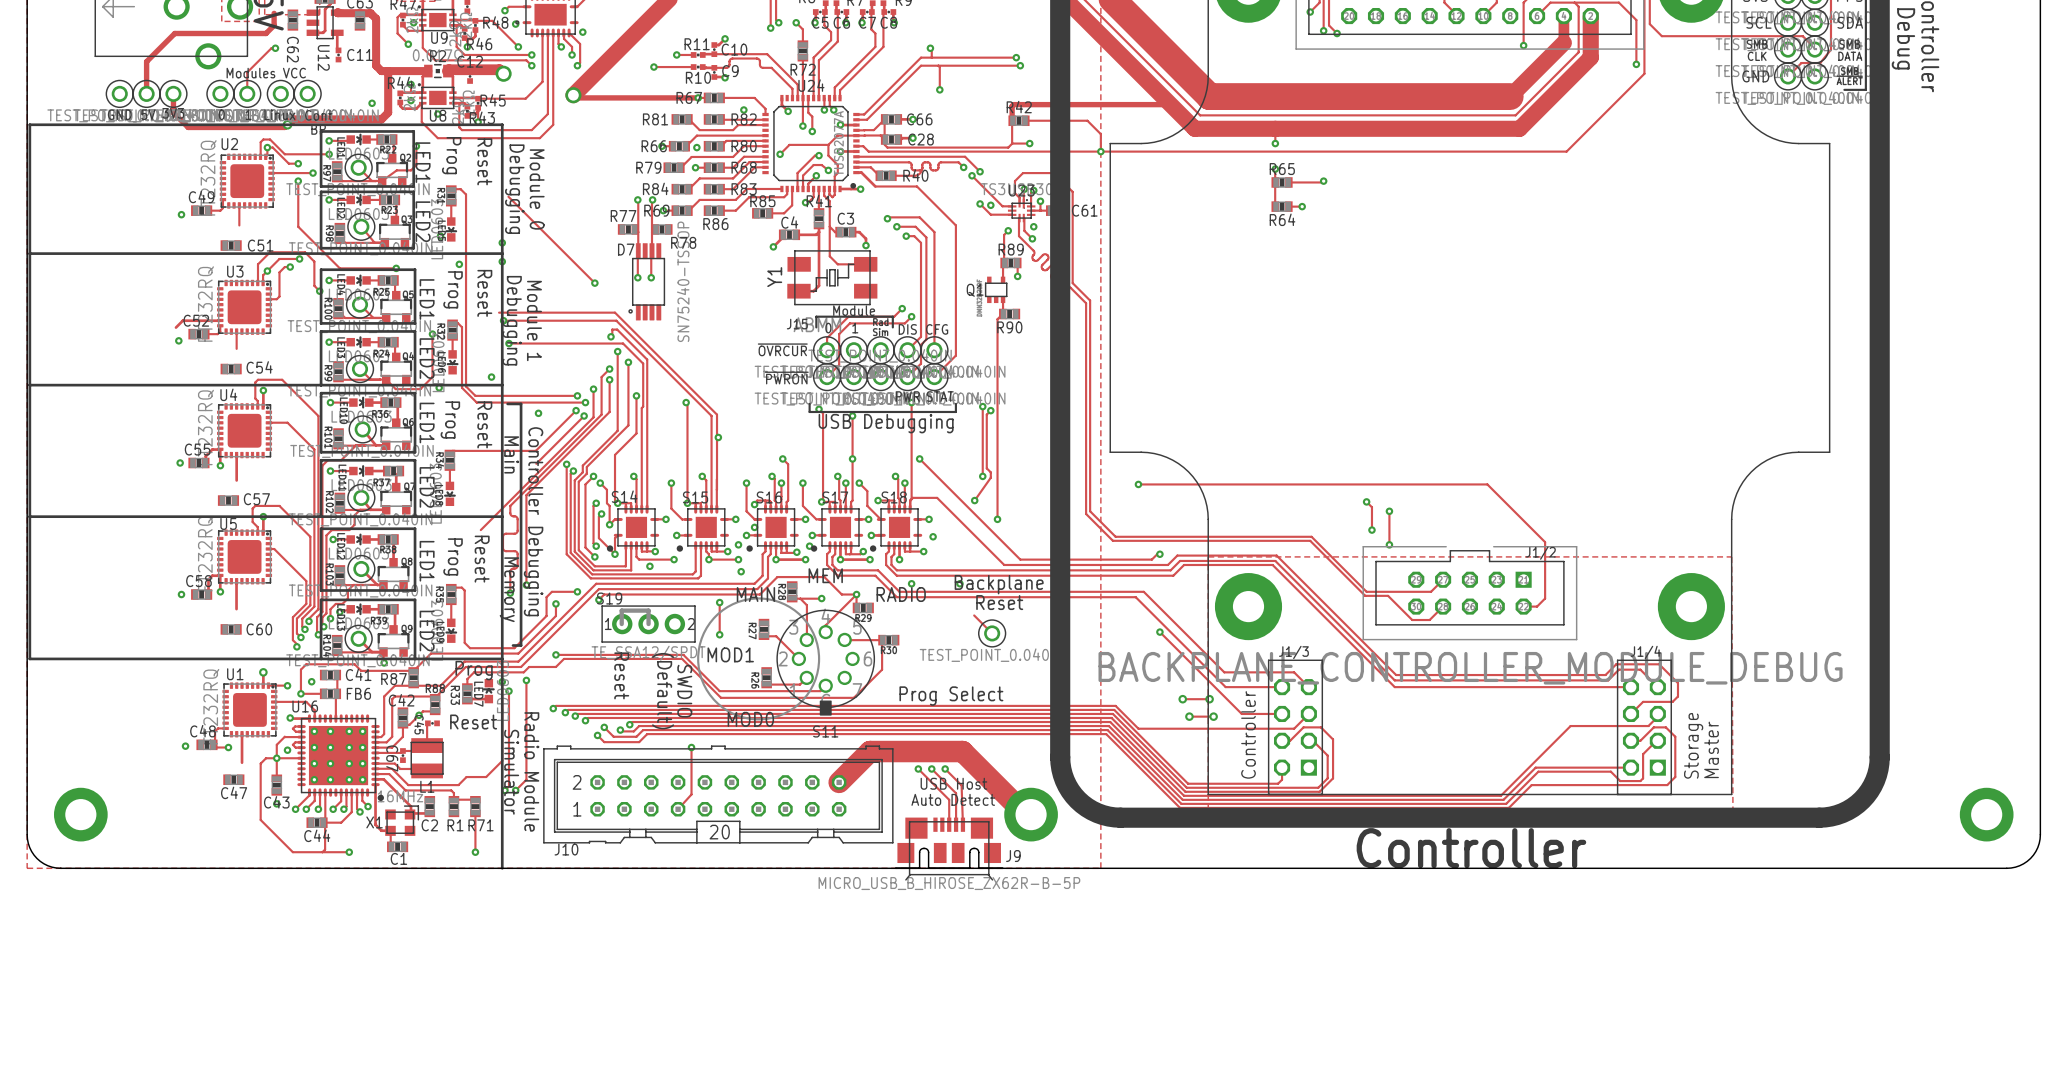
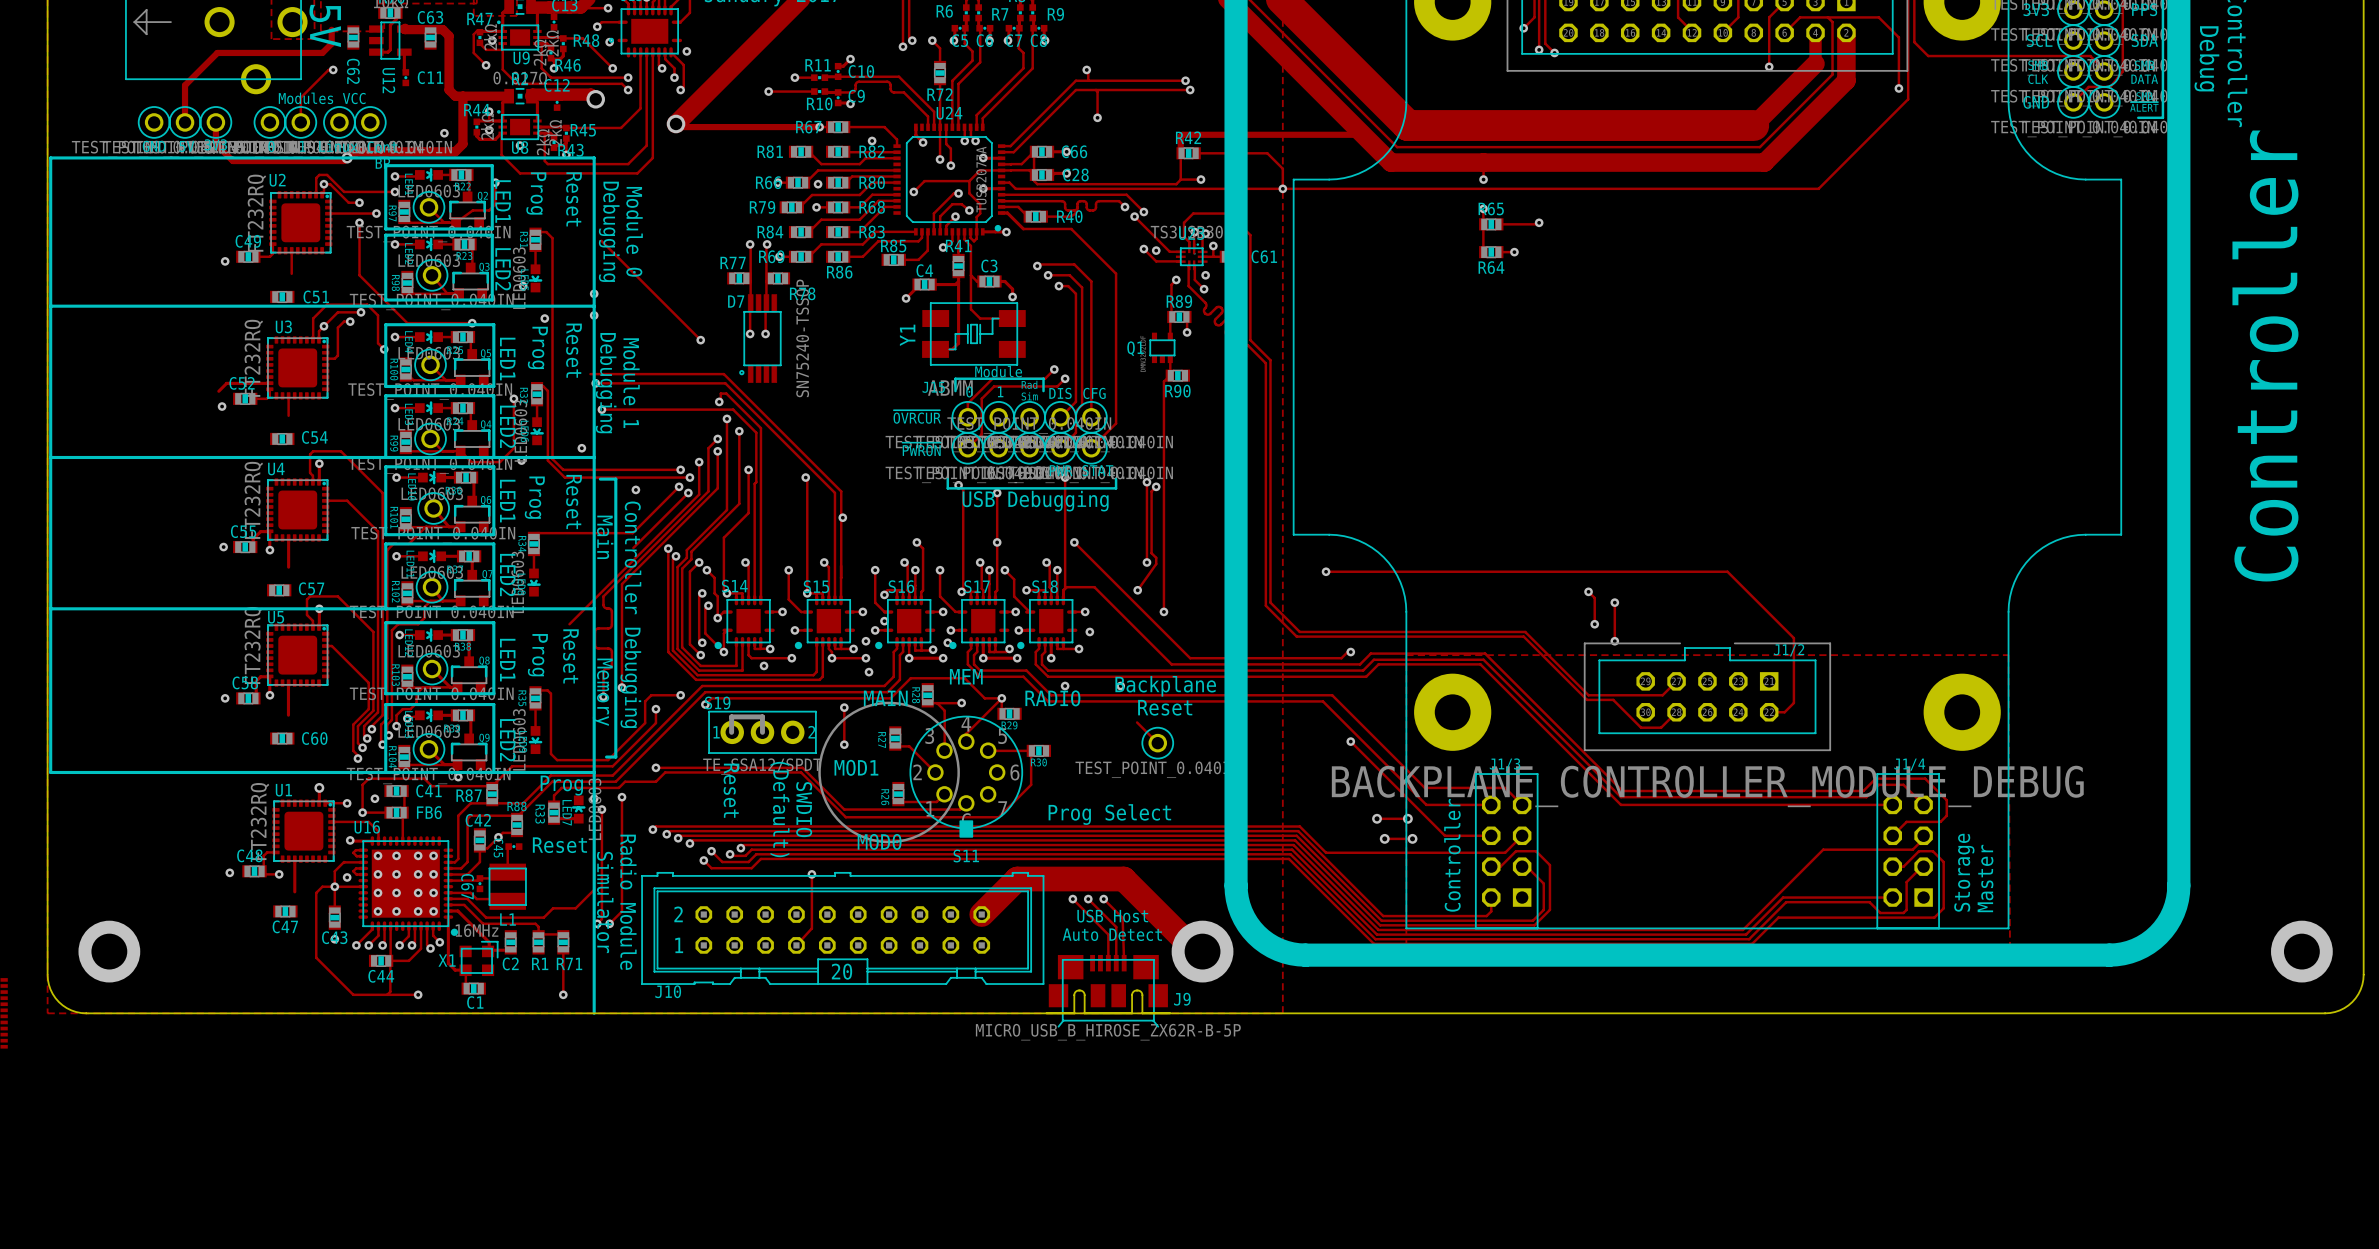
text: none -> Controller (2265, 356)
text: Controller (1471, 848) -> none

